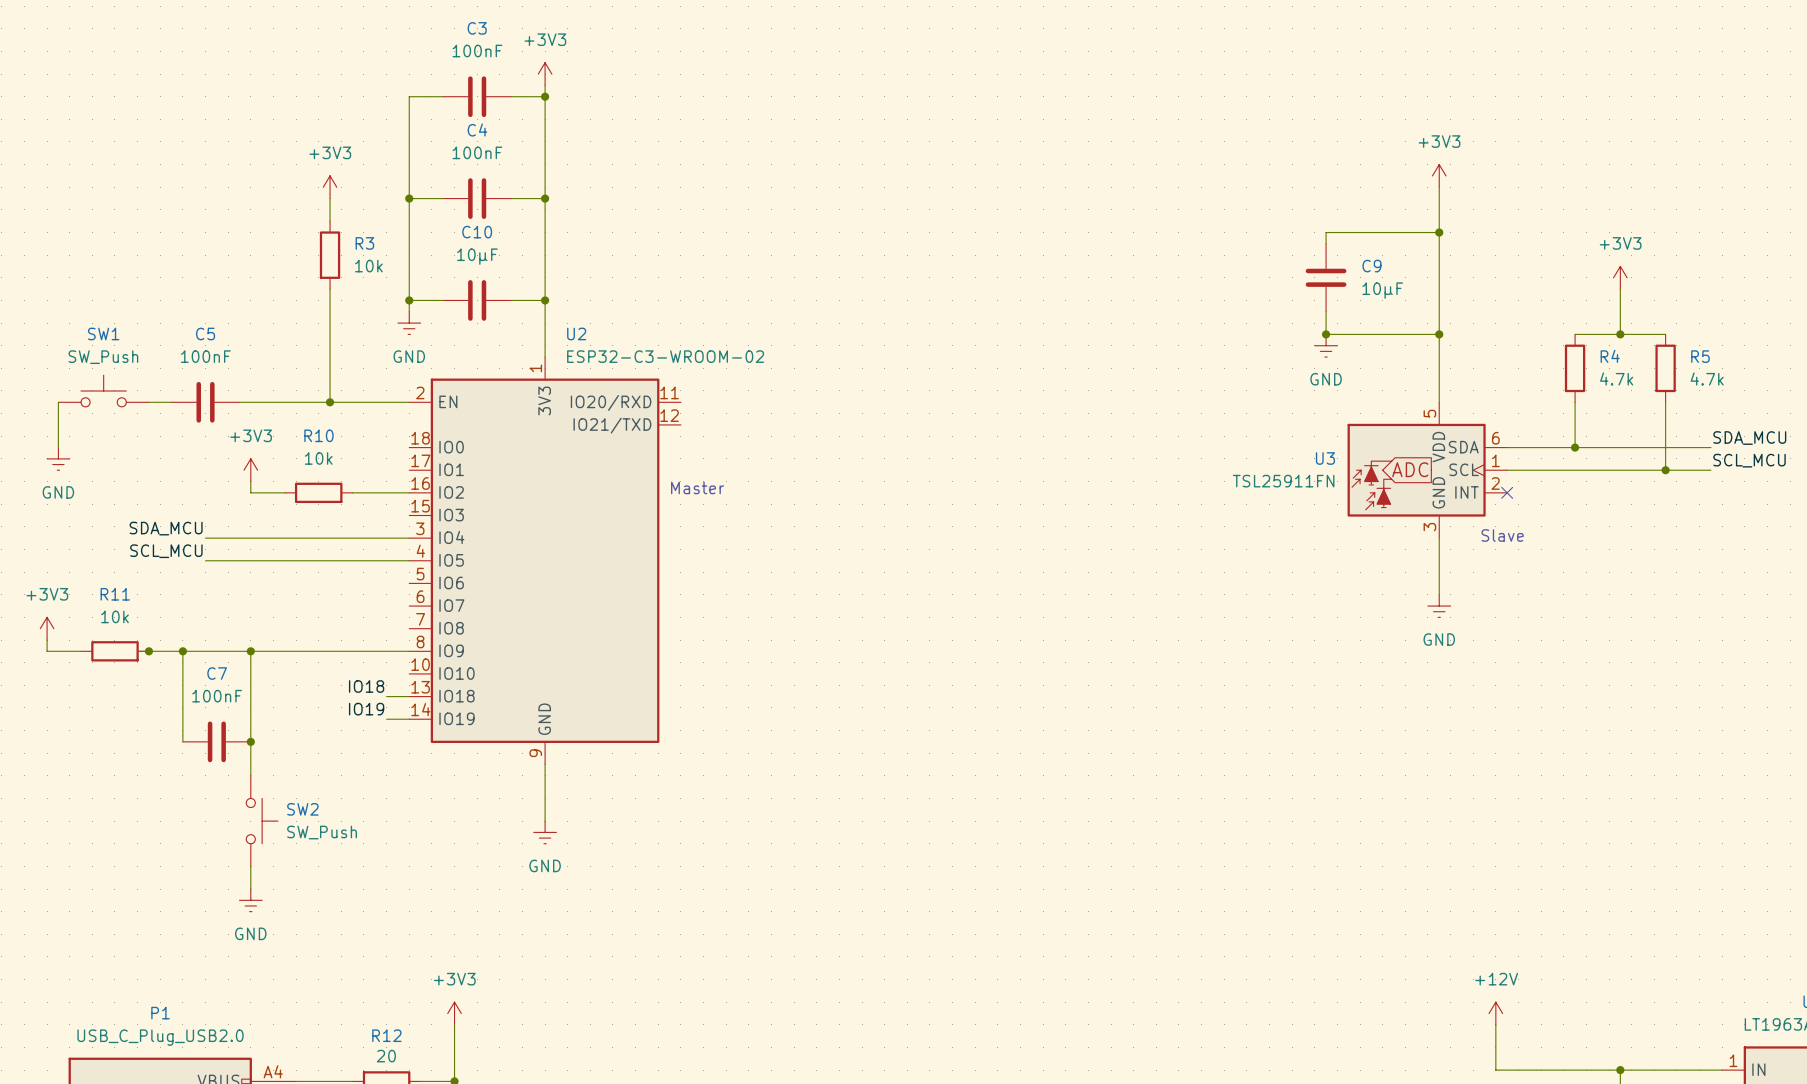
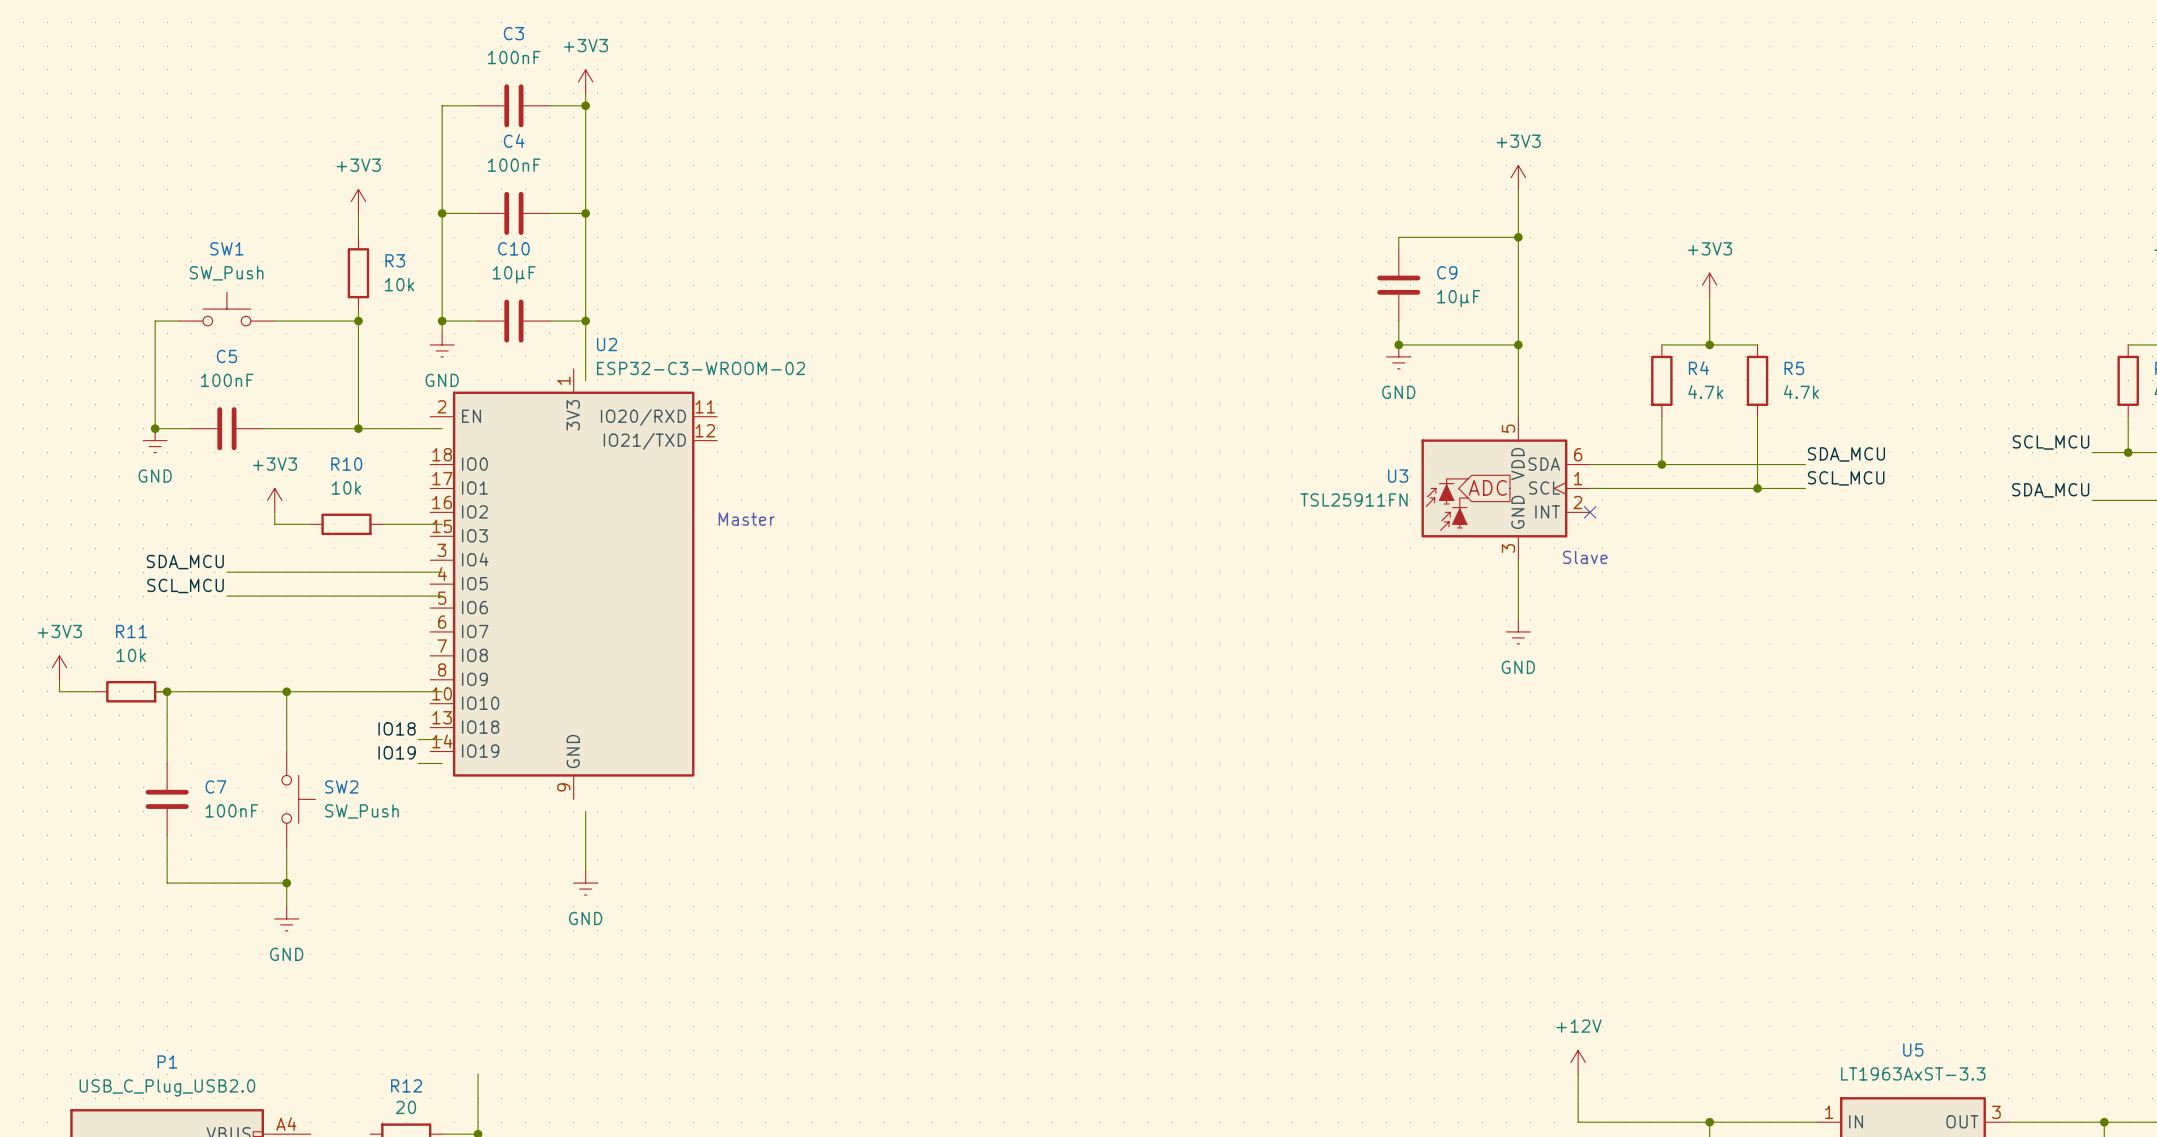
power symbol position: +3V3 (545, 74) -> +3V3 (585, 81)
wire: (545, 85) (545, 357) -> (585, 93) (585, 380)
wire: (443, 96) (409, 96) (409, 311) -> (478, 105) (442, 105) (442, 333)
C3 position: (477, 96) -> (513, 105)
wire: (511, 96) (545, 96) -> (549, 105) (585, 105)
junction position: (545, 96) -> (585, 105)
power symbol position: +3V3 (330, 187) -> +3V3 (358, 201)
wire: (330, 198) (330, 221) -> (358, 213) (358, 237)
wire: (409, 198) (443, 198) -> (442, 213) (478, 213)
junction position: (409, 198) -> (442, 213)
C4 position: (477, 198) -> (513, 213)
wire: (511, 198) (545, 198) -> (549, 213) (585, 213)
junction position: (545, 198) -> (585, 213)
R3 position: (330, 255) -> (358, 273)
wire: (330, 289) (330, 402) -> (358, 309) (358, 428)
wire: (409, 300) (443, 300) -> (442, 321) (478, 321)
junction position: (409, 300) -> (442, 321)
C10 position: (477, 300) -> (513, 321)
wire: (511, 300) (545, 300) -> (549, 321) (585, 321)
junction position: (545, 300) -> (585, 321)
wire: none -> (179, 321) (155, 321) (155, 428) (191, 428)
wire: none -> (274, 321) (358, 321)
junction: none -> (358, 321)
power symbol position: GND (409, 323) -> GND (442, 344)
SW1 position: (103, 390) -> (226, 309)
wire: (58, 402) (58, 447) -> none
wire: (148, 402) (171, 402) -> none
C5 position: (205, 402) -> (226, 428)
wire: (239, 402) (409, 402) -> (262, 428) (442, 428)
junction position: (330, 402) -> (358, 428)
junction: none -> (155, 428)
power symbol position: GND (58, 458) -> GND (155, 440)
power symbol position: +3V3 (250, 470) -> +3V3 (274, 500)
wire: (250, 481) (250, 492) (284, 492) -> (274, 512) (274, 524) (310, 524)
text position: Master (697, 487) -> Master (746, 519)
R10 position: (318, 492) -> (346, 524)
wire: (352, 492) (409, 492) -> (382, 524) (442, 524)
label position: SDA_MCU (166, 528) -> SDA_MCU (185, 562)
wire: (205, 538) (409, 538) -> (226, 572) (442, 572)
label position: SCL_MCU (166, 551) -> SCL_MCU (185, 585)
wire: (205, 560) (409, 560) -> (226, 596) (442, 596)
power symbol position: +3V3 (47, 628) -> +3V3 (59, 667)
wire: (47, 640) (47, 651) (81, 651) -> (59, 679) (59, 691) (95, 691)
R11 position: (114, 651) -> (131, 691)
wire: (137, 651) (409, 651) -> (155, 691) (442, 691)
junction: (148, 651) -> none
wire: (182, 651) (182, 741) -> none
junction: (182, 651) -> none
wire: (250, 651) (250, 775) -> none
junction position: (250, 651) -> (286, 691)
wire: none -> (167, 691) (167, 763)
junction: none -> (167, 691)
wire: none -> (286, 691) (286, 751)
C7 name position: C7 (217, 673) -> C7 (215, 786)
label position: IO18 (366, 686) -> IO18 (397, 728)
C7 value position: 100nF (217, 696) -> 100nF (231, 810)
wire: (386, 696) (409, 696) -> (418, 739) (442, 739)
label position: IO19 (366, 709) -> IO19 (397, 752)
wire: (386, 719) (409, 719) -> (418, 763) (442, 763)
C7 rotation: 0° (216, 741) -> 90° clockwise (167, 799)
C7 position: (216, 741) -> (167, 799)
junction: (250, 741) -> none
wire: (545, 764) (545, 821) -> (585, 811) (585, 871)
wire: none -> (167, 835) (167, 883) (286, 883)
wire: none -> (286, 847) (286, 906)
SW2 position: (262, 821) -> (298, 799)
power symbol position: GND (545, 832) -> GND (585, 883)
junction: none -> (286, 883)
wire: (250, 866) (250, 889) -> none
power symbol position: GND (250, 900) -> GND (286, 918)
power symbol: +3V3 (454, 1013) -> none
wire: (296, 1081) (352, 1081) -> none

